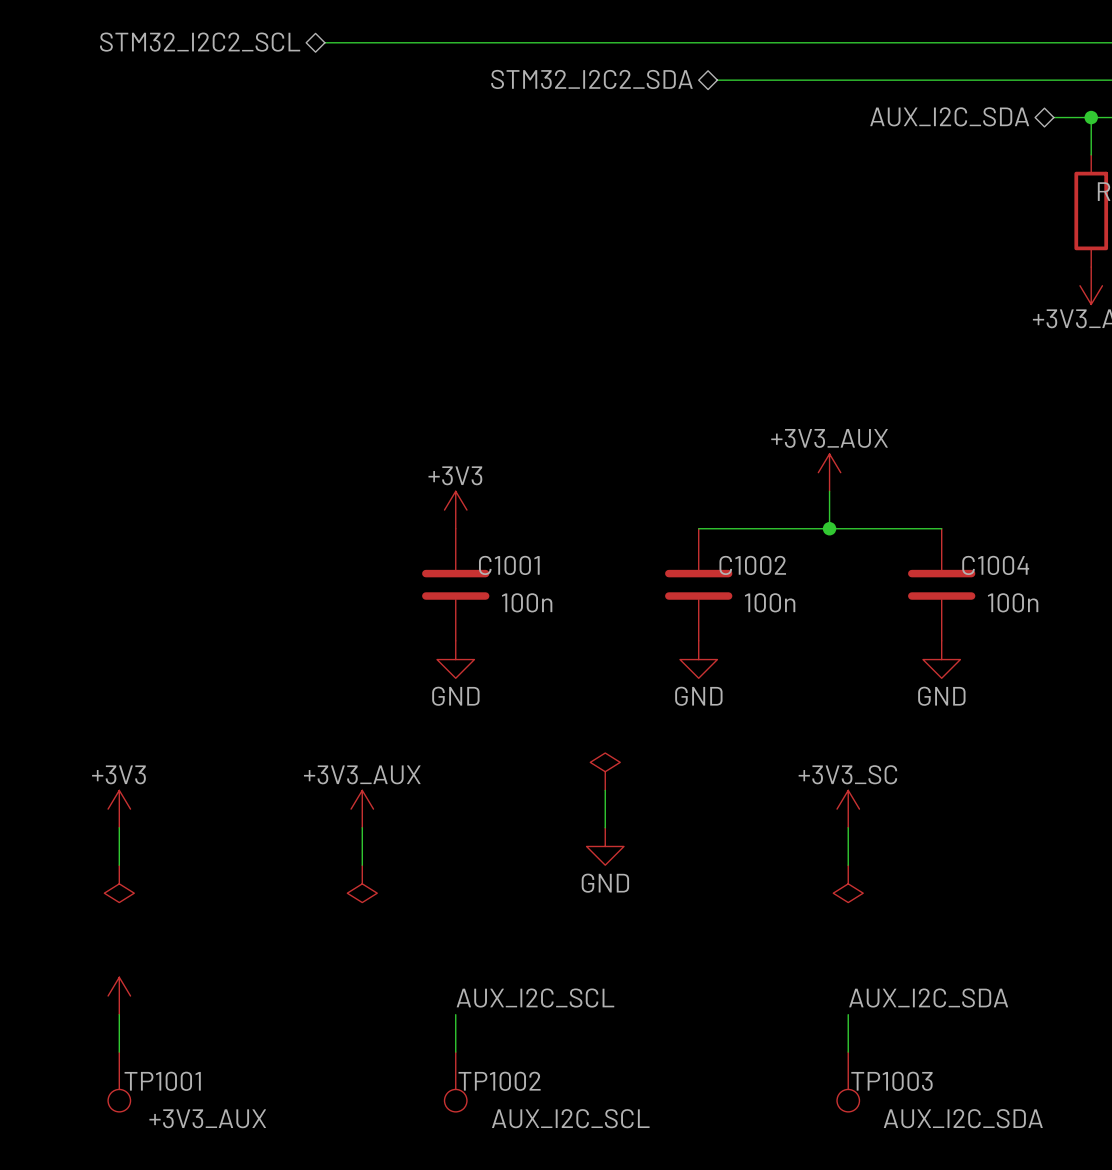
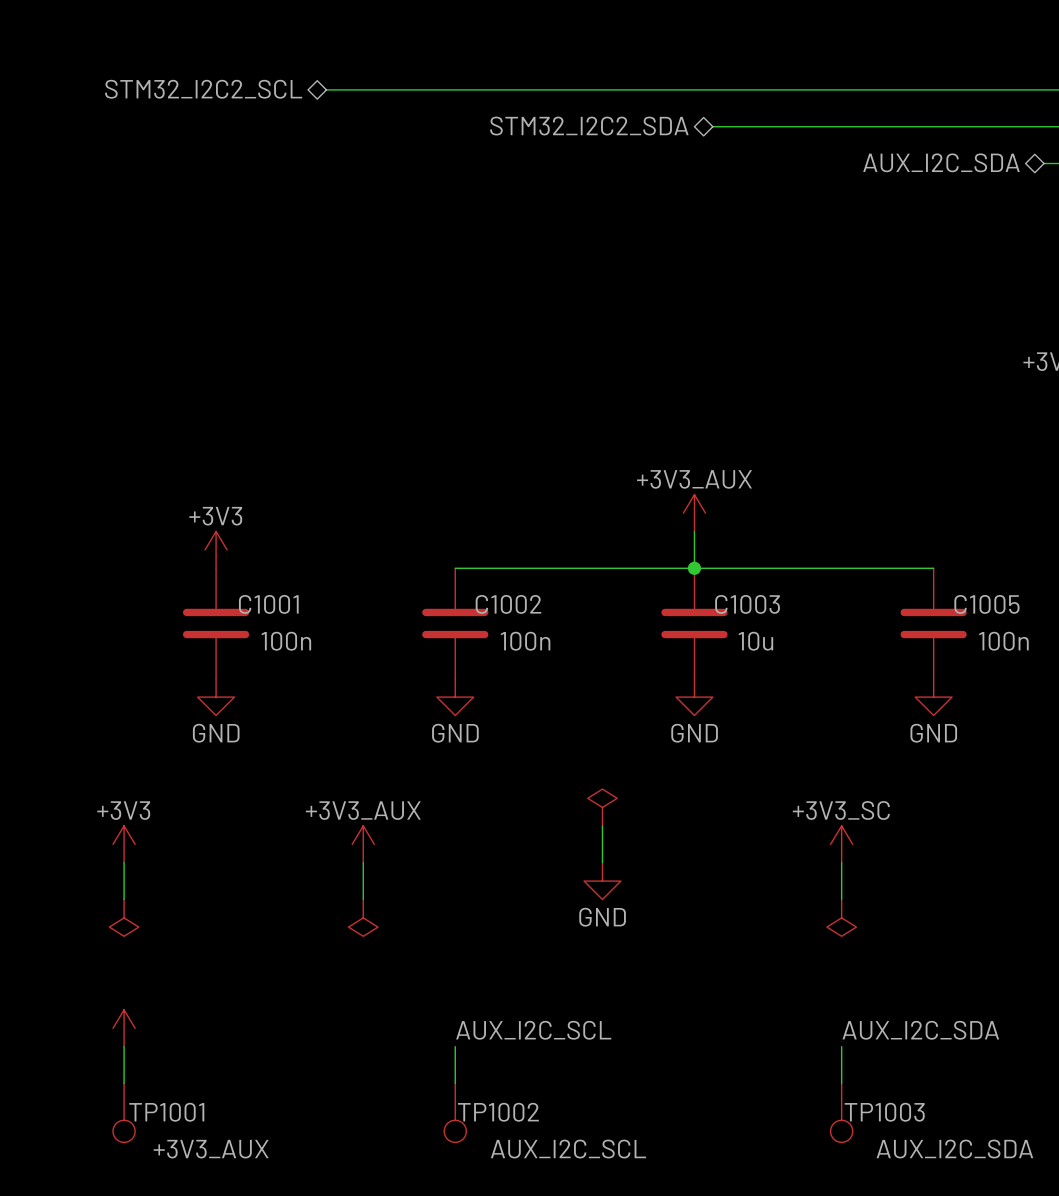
power symbol position: +3V3_AUX (829, 472) -> +3V3_AUX (694, 513)
wire: none -> (694, 531) (694, 568) (455, 568)
wire: (829, 491) (829, 528) -> none
power symbol position: +3V3 (455, 510) -> +3V3 (216, 549)
junction: none -> (694, 568)
junction: (829, 528) -> none
C1001 name: C1001 (509, 565) -> C1002 (508, 604)
C1002 name: C1002 (752, 565) -> C1003 (747, 604)
C1004 name: C1004 (995, 565) -> C1005 (986, 604)
C1001: none -> 100n (216, 623)
C1002 value: 100n (770, 602) -> 10u (755, 641)
power symbol: none -> GND (216, 697)

